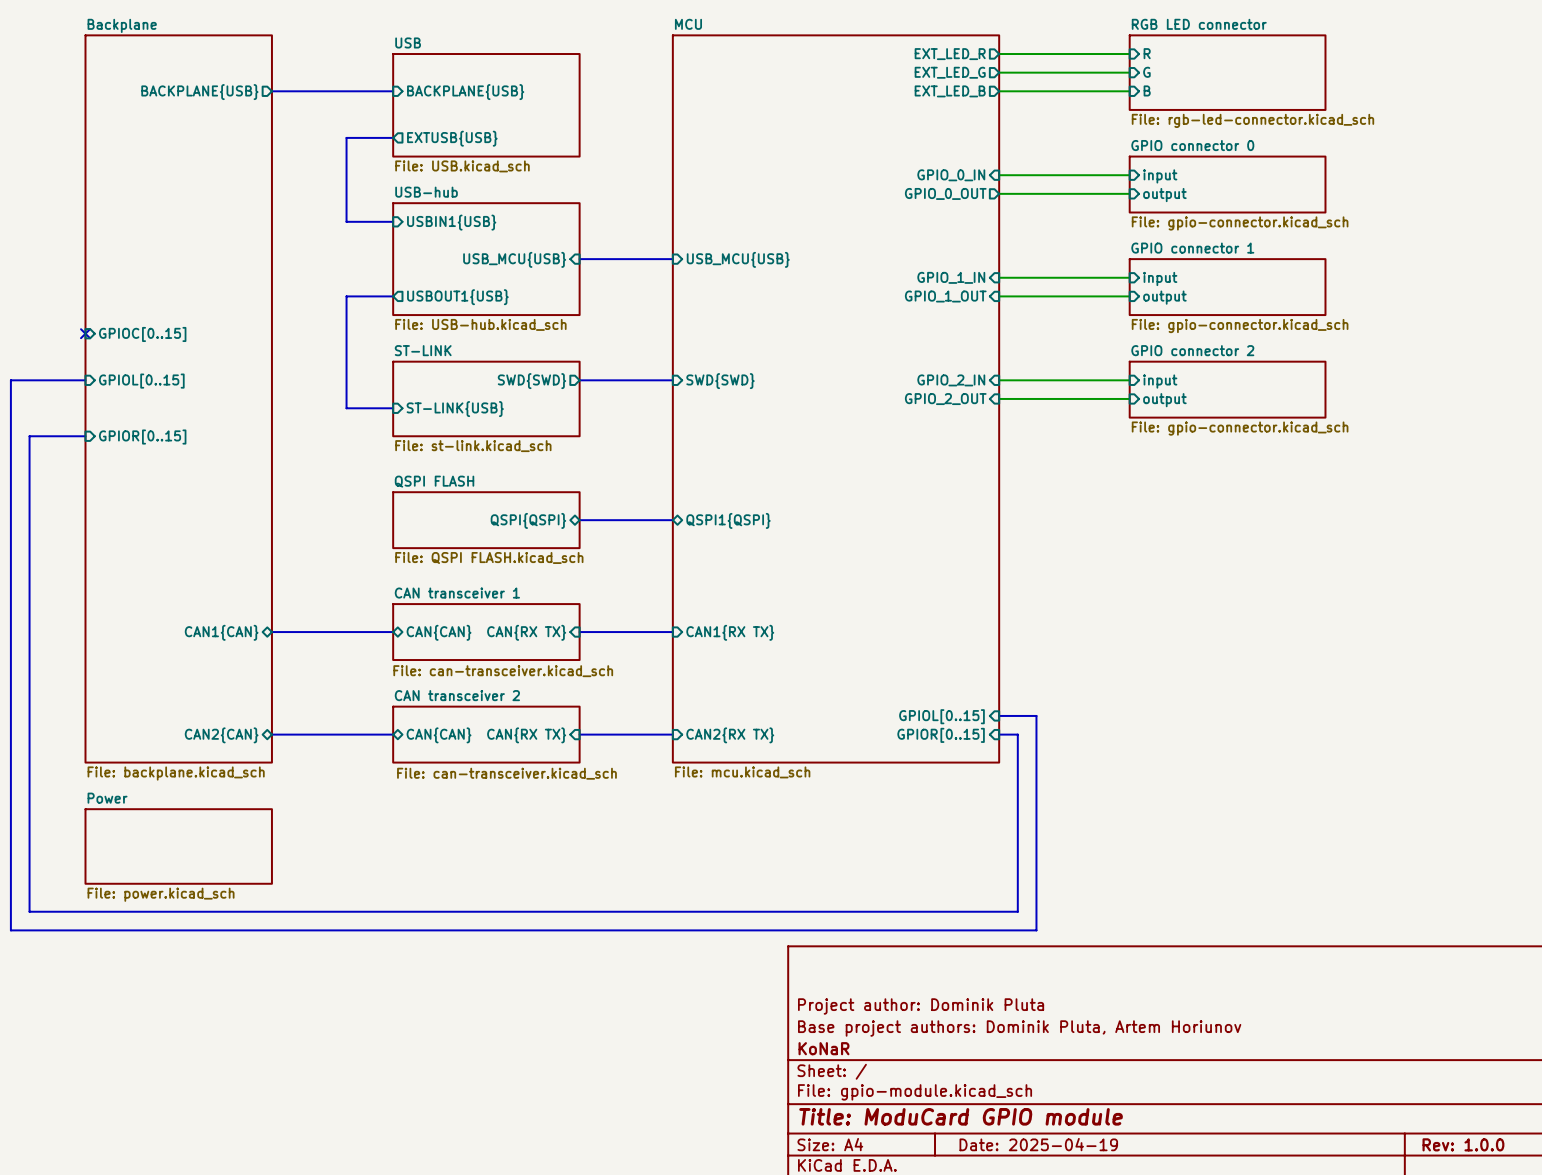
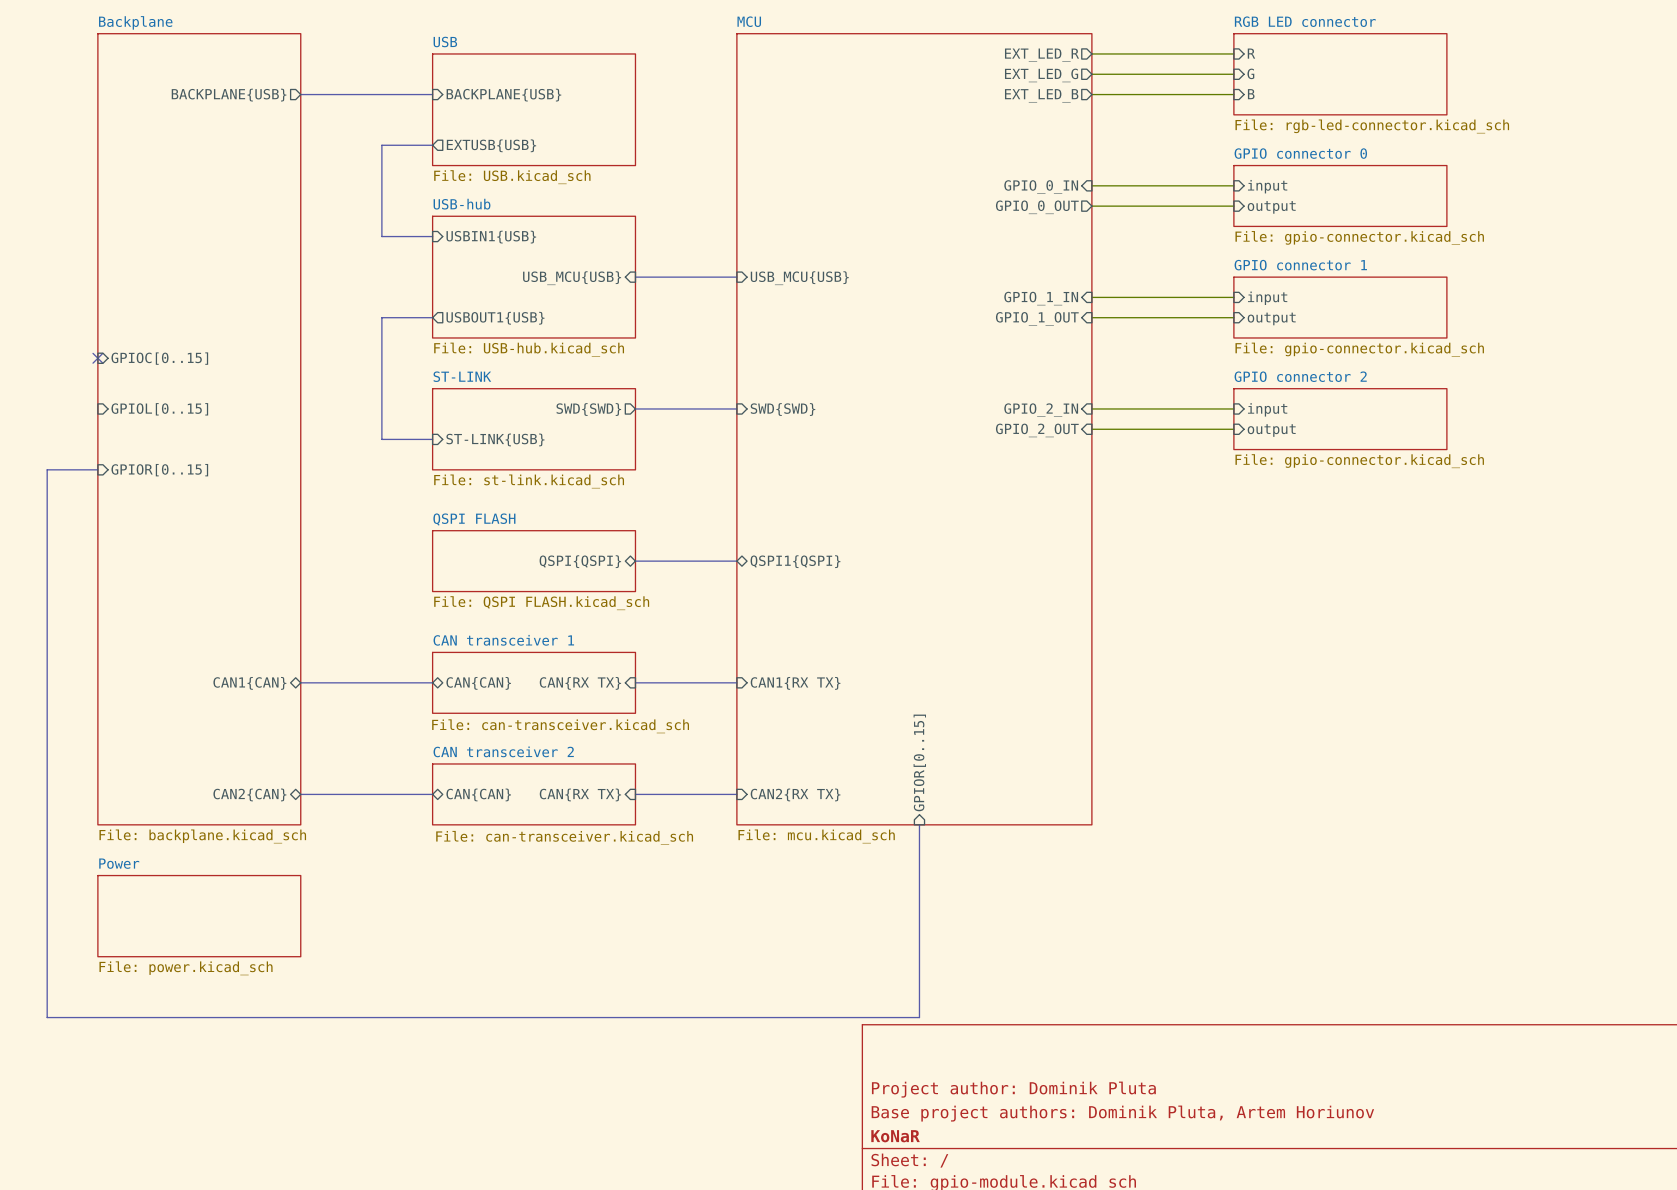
bus: (85, 380) (10, 380) (10, 930) (1036, 930) (1036, 715) (999, 715) -> none
bus: (38, 436) (29, 436) (29, 911) (1017, 911) (1017, 734) (999, 734) -> (47, 469) (47, 1017) (919, 1017) (919, 824)
sheet pin: GPIOL[0..15] (941, 716) -> none
sheet pin rotation: 0° (941, 735) -> 90° clockwise (919, 762)

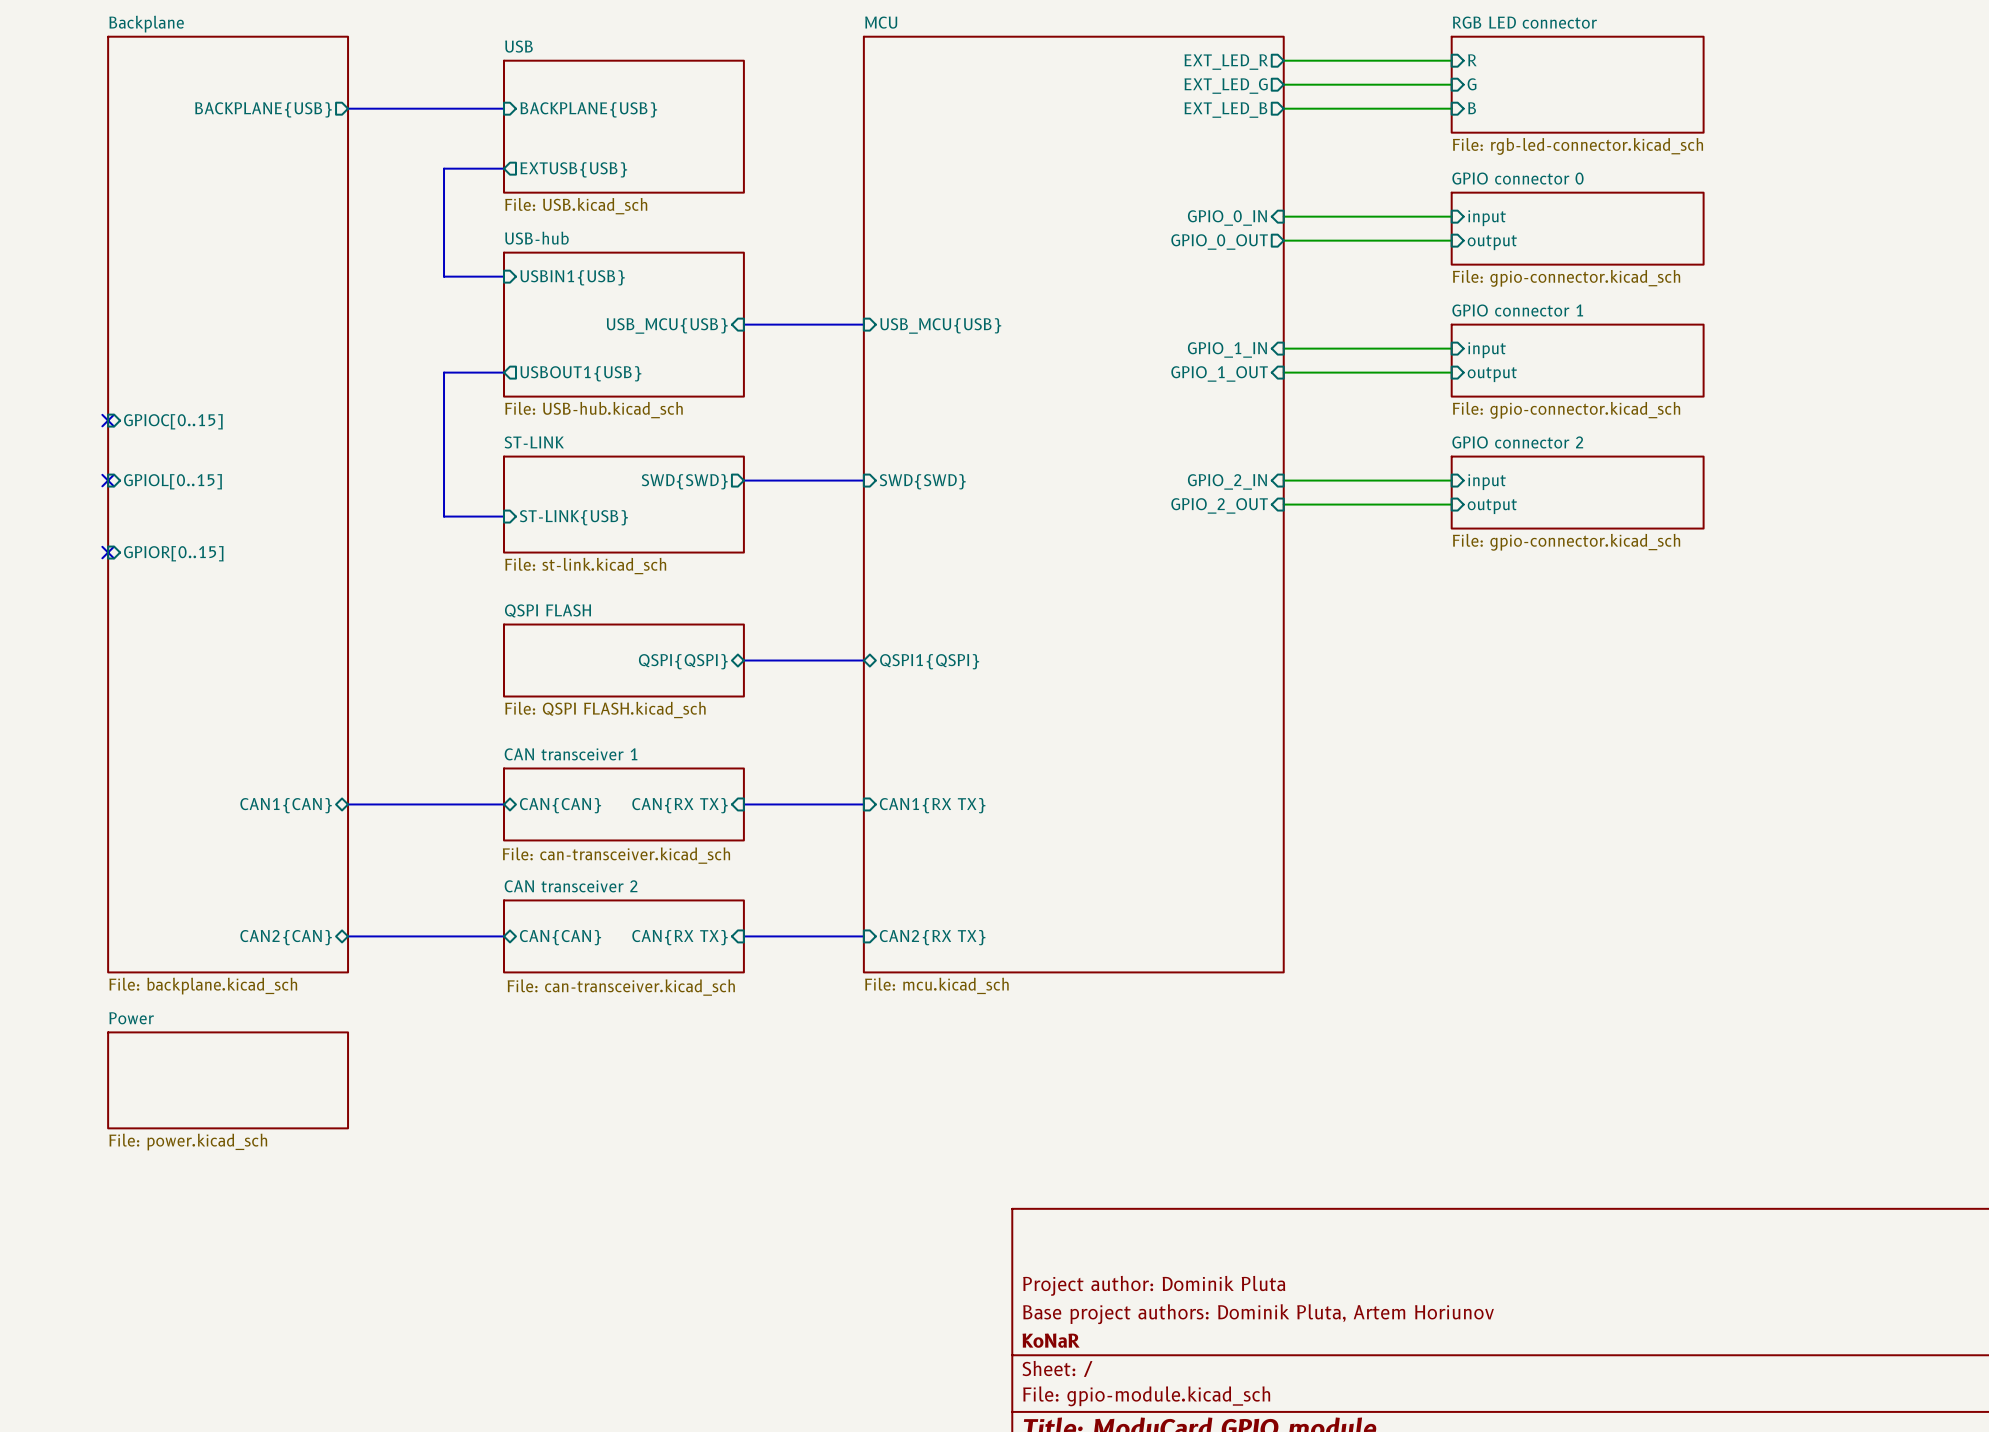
no-connect mark: none -> (108, 480)
bus: (97, 469) (47, 469) (47, 1017) (919, 1017) (919, 824) -> none
no-connect mark: none -> (108, 552)
sheet pin: GPIOR[0..15] (919, 762) -> none

